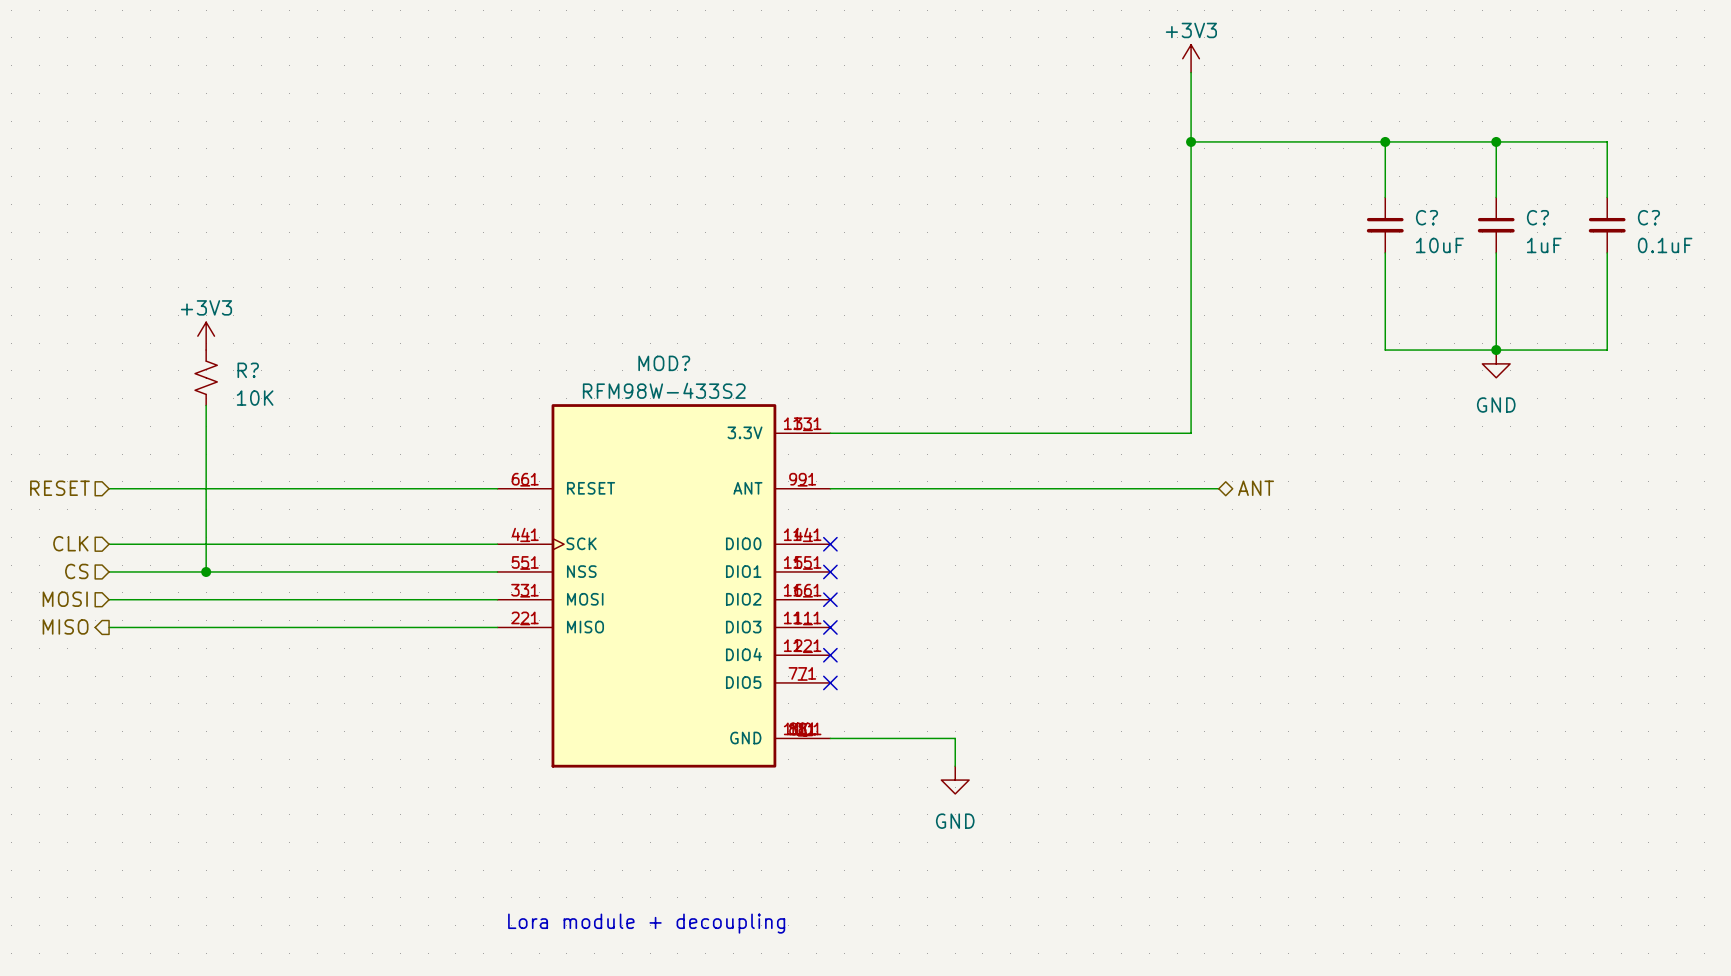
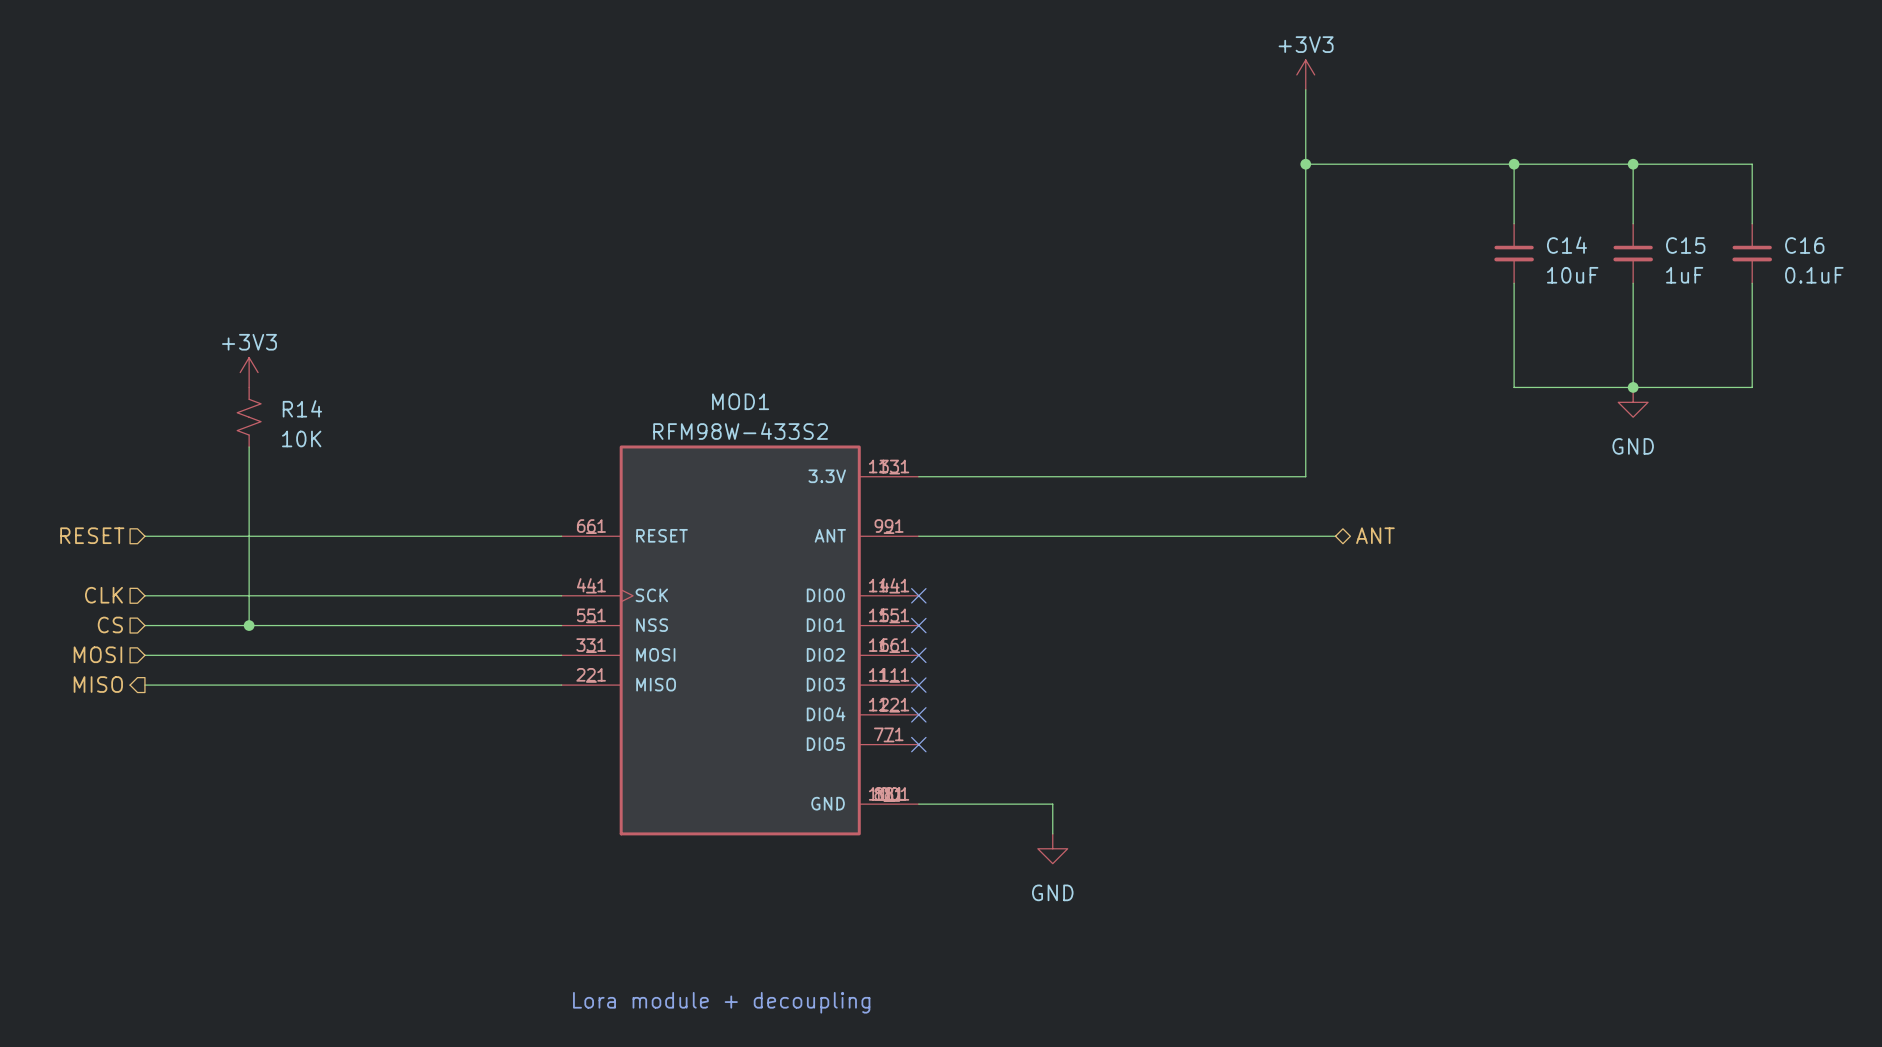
C? name: C? (1426, 217) -> C14 (1567, 245)
C? name: C? (1537, 217) -> C15 (1685, 245)
C? name: C? (1648, 217) -> C16 (1804, 245)
MOD? name: MOD? (664, 363) -> MOD1 (740, 401)
R? name: R? (248, 370) -> R14 (302, 408)

